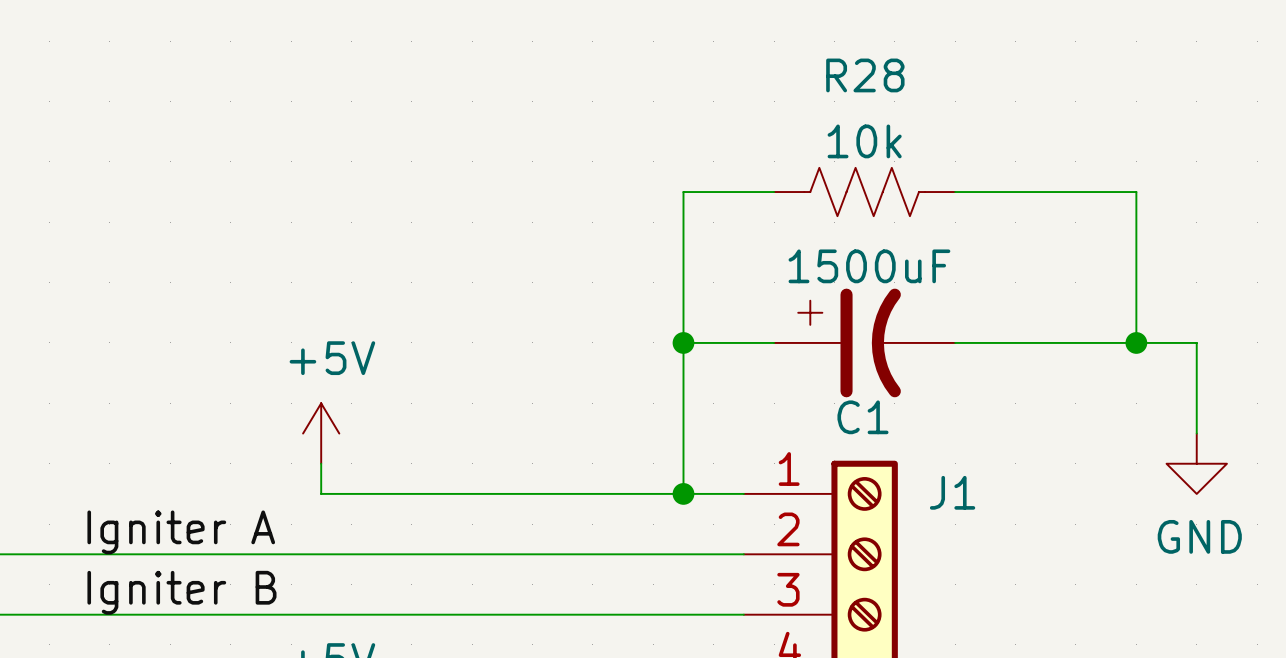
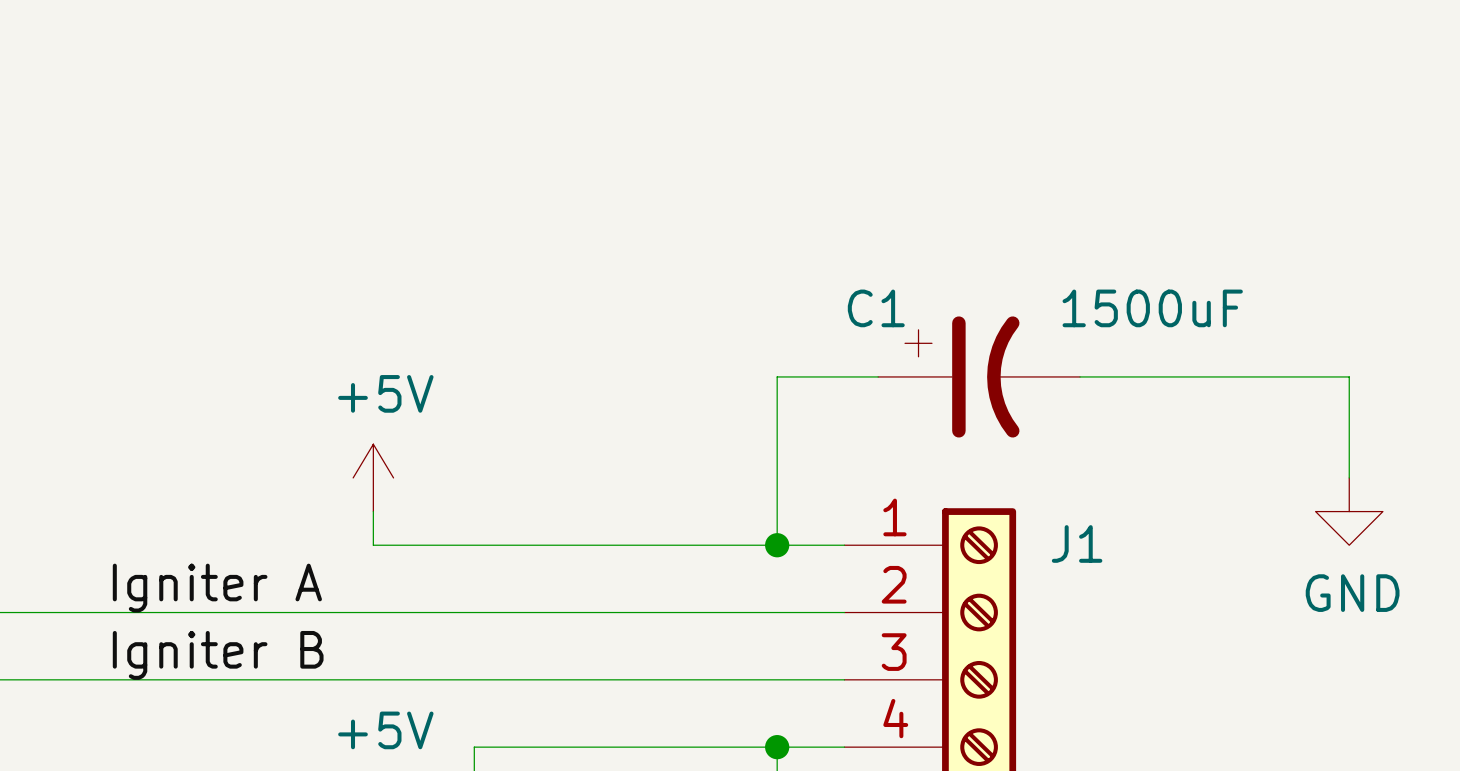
wire: (774, 192) (683, 192) (683, 342) -> none
R28: 10k (864, 192) -> none
wire: (955, 192) (1136, 192) (1136, 342) -> none
C1 value position: 1500uF (869, 266) -> 1500uF (1152, 308)
junction: (683, 342) -> none
junction: (1136, 342) -> none
C1 name position: C1 (862, 417) -> C1 (876, 308)

